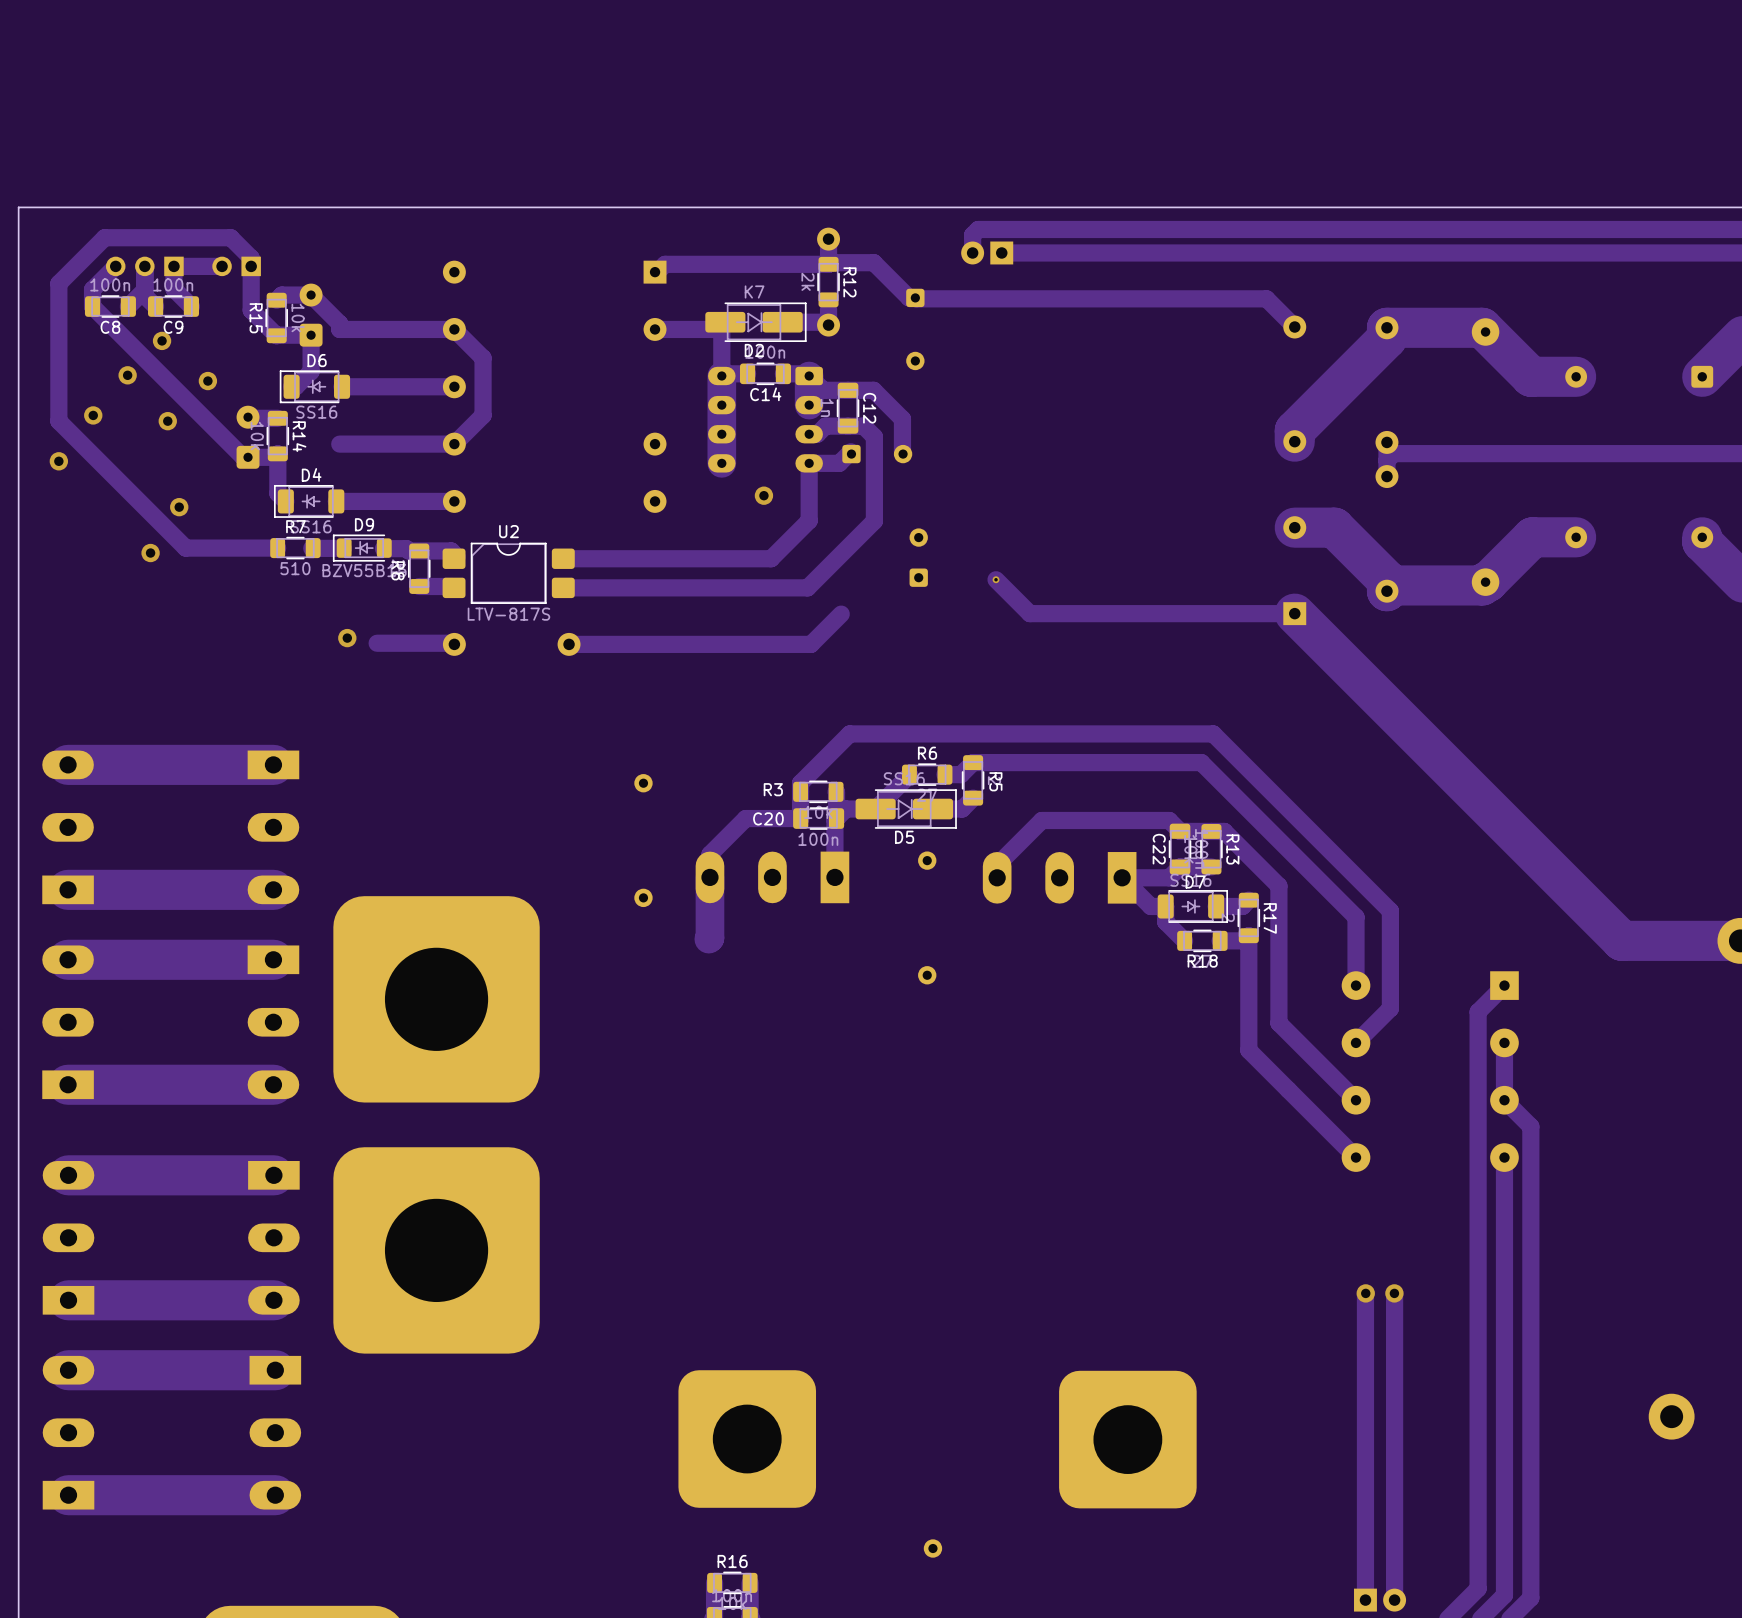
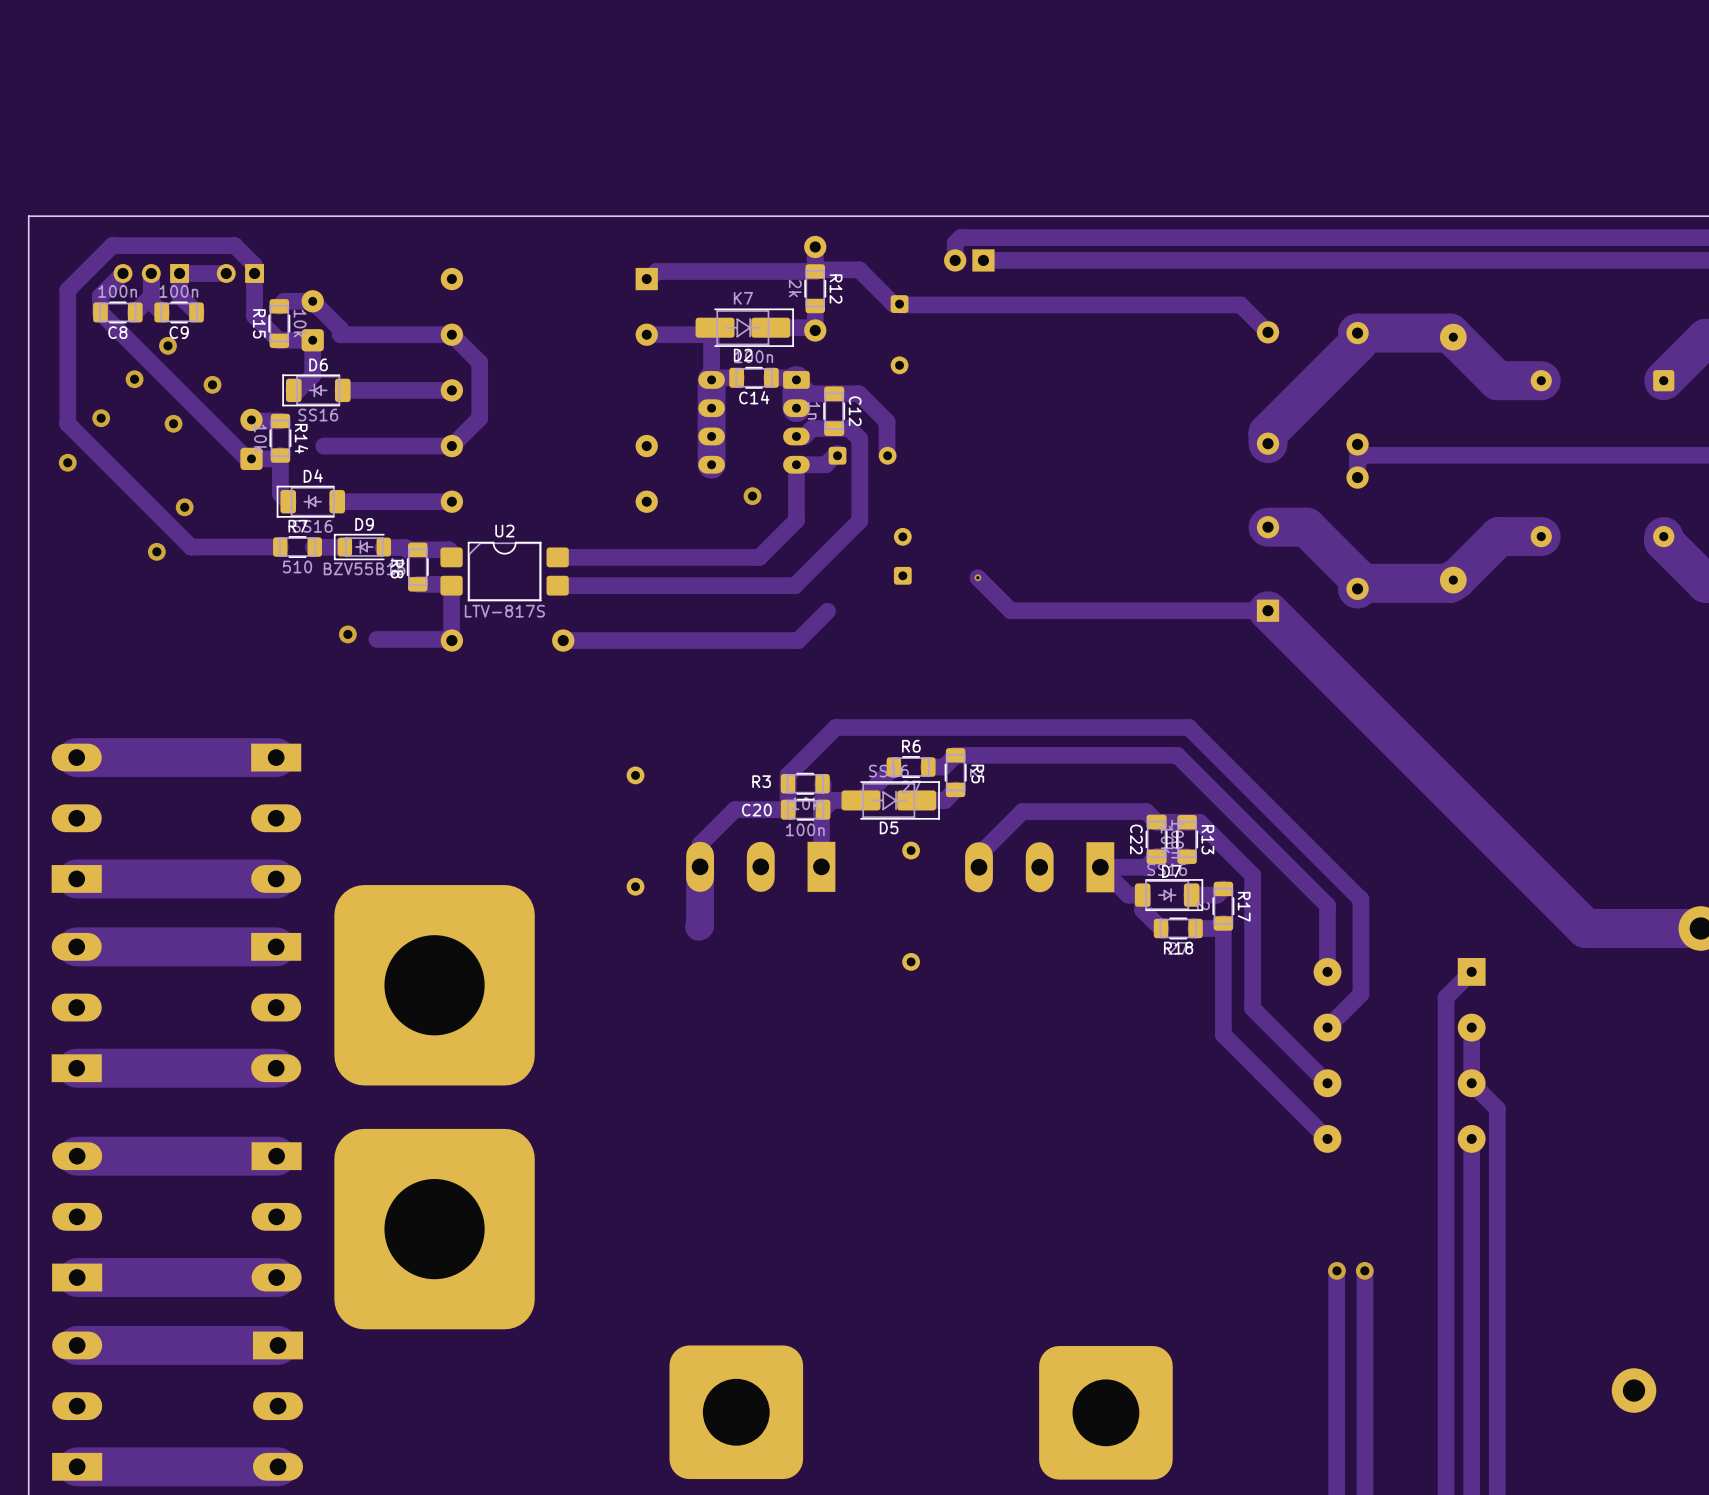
track: none -> (340, 446) (323, 446)
track: none -> (451, 585) (451, 640)

